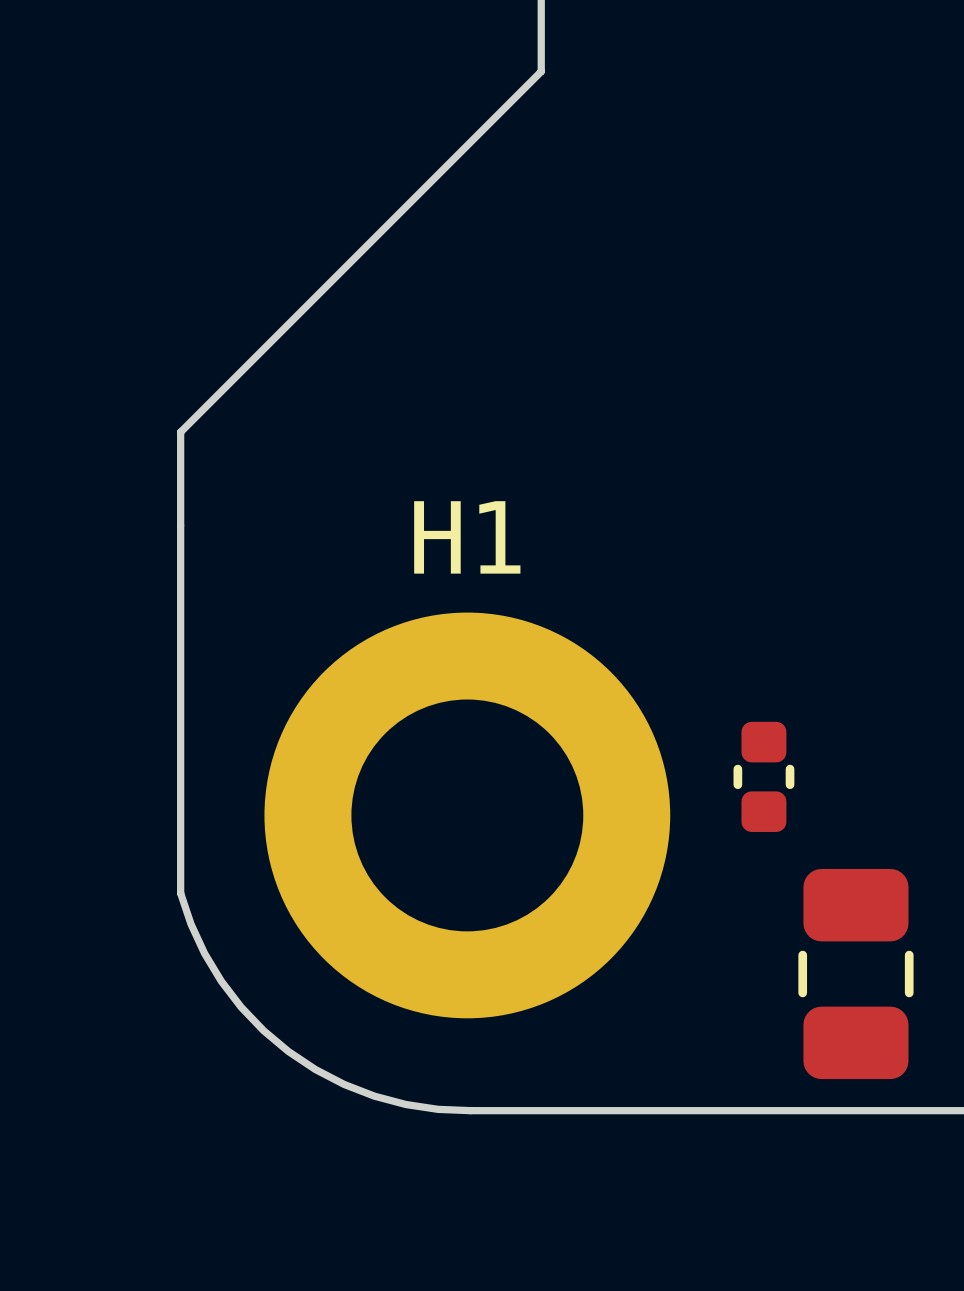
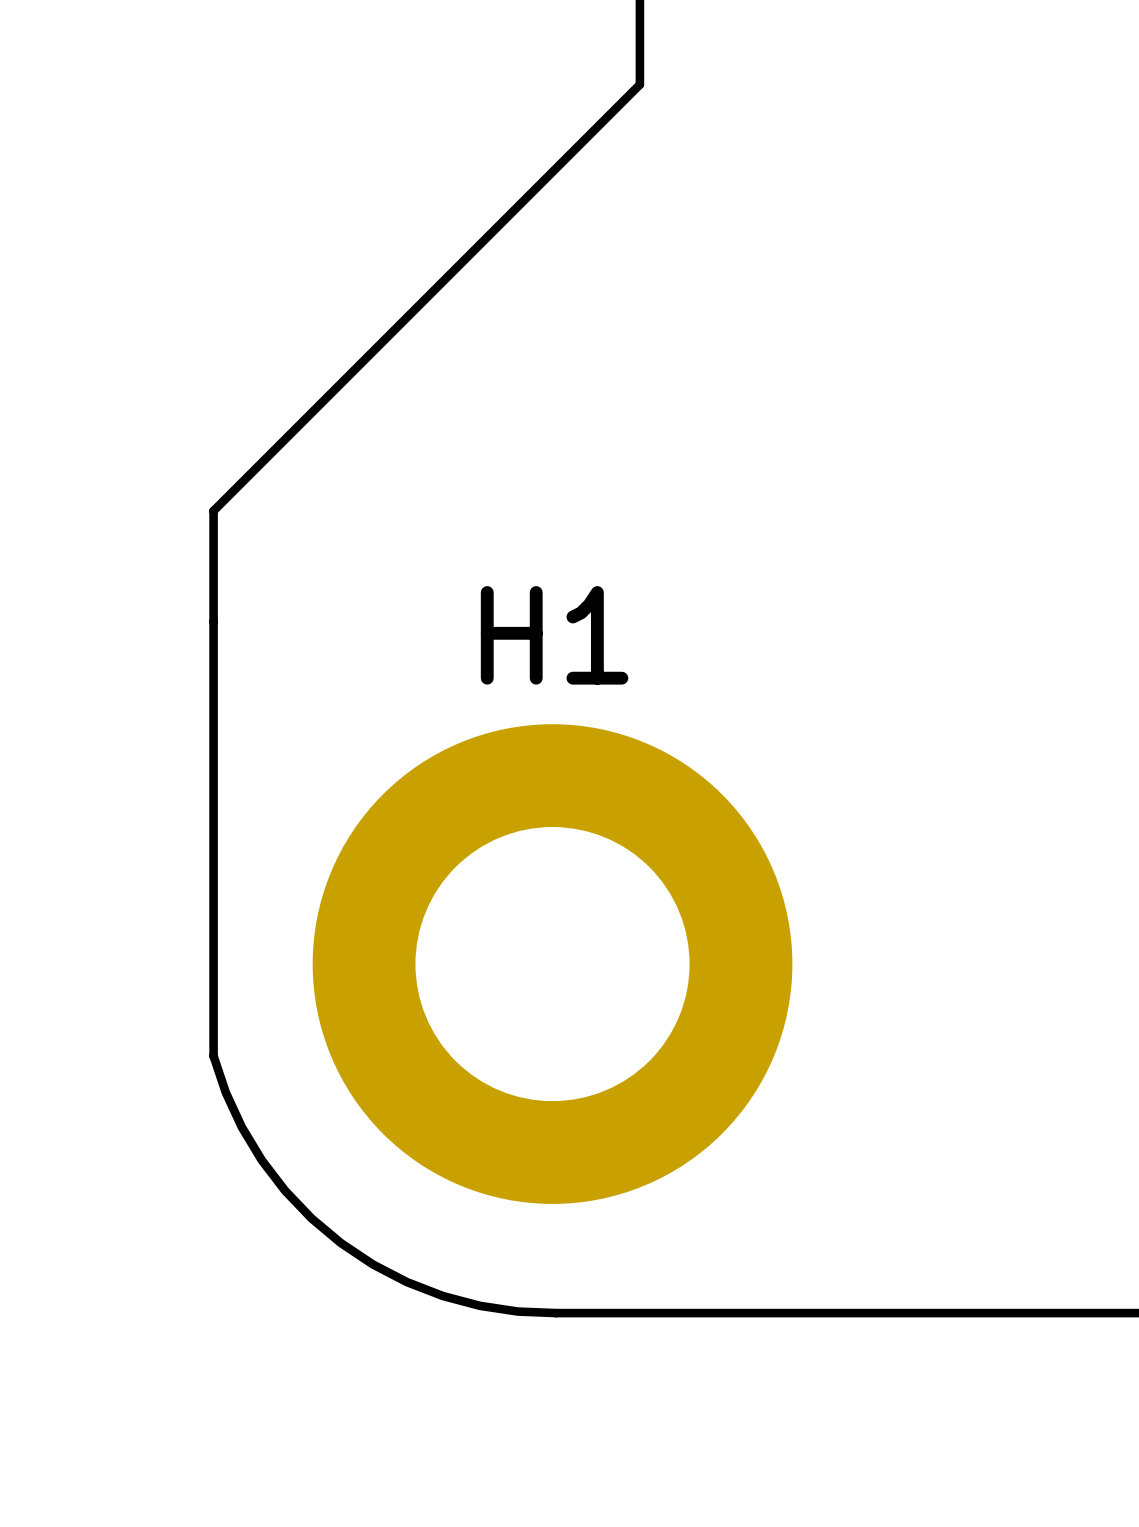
part: (763, 776) -> none
part: (855, 974) -> none

